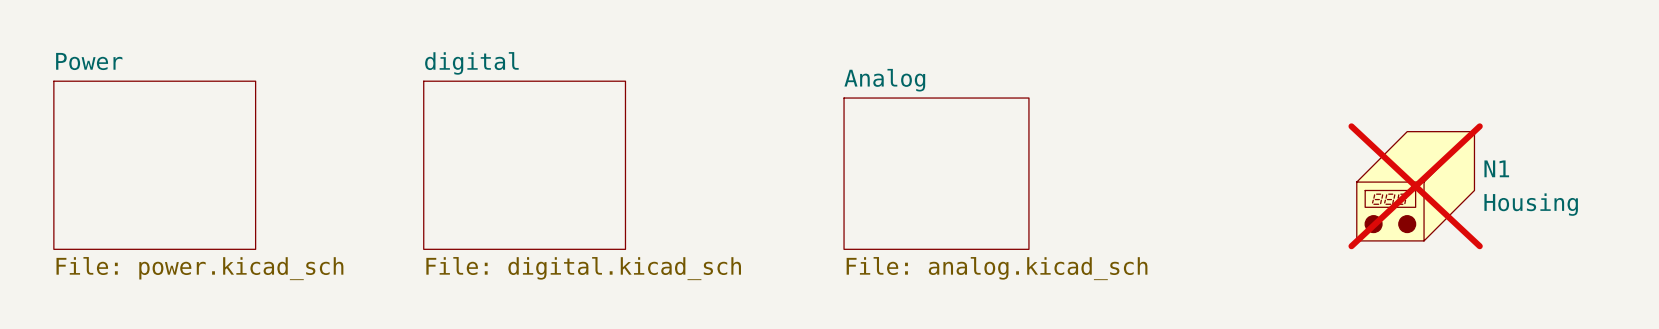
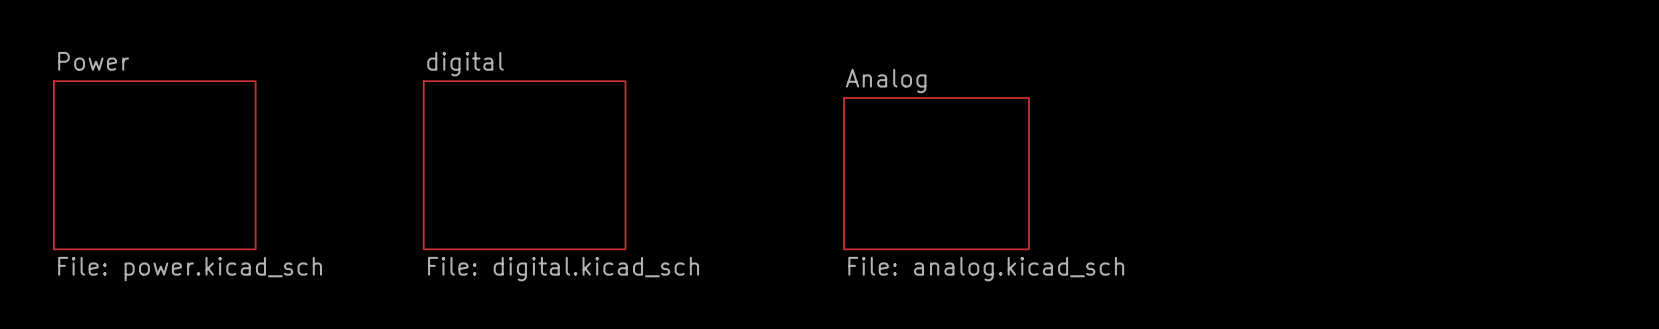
N1: Housing (1415, 186) -> none

